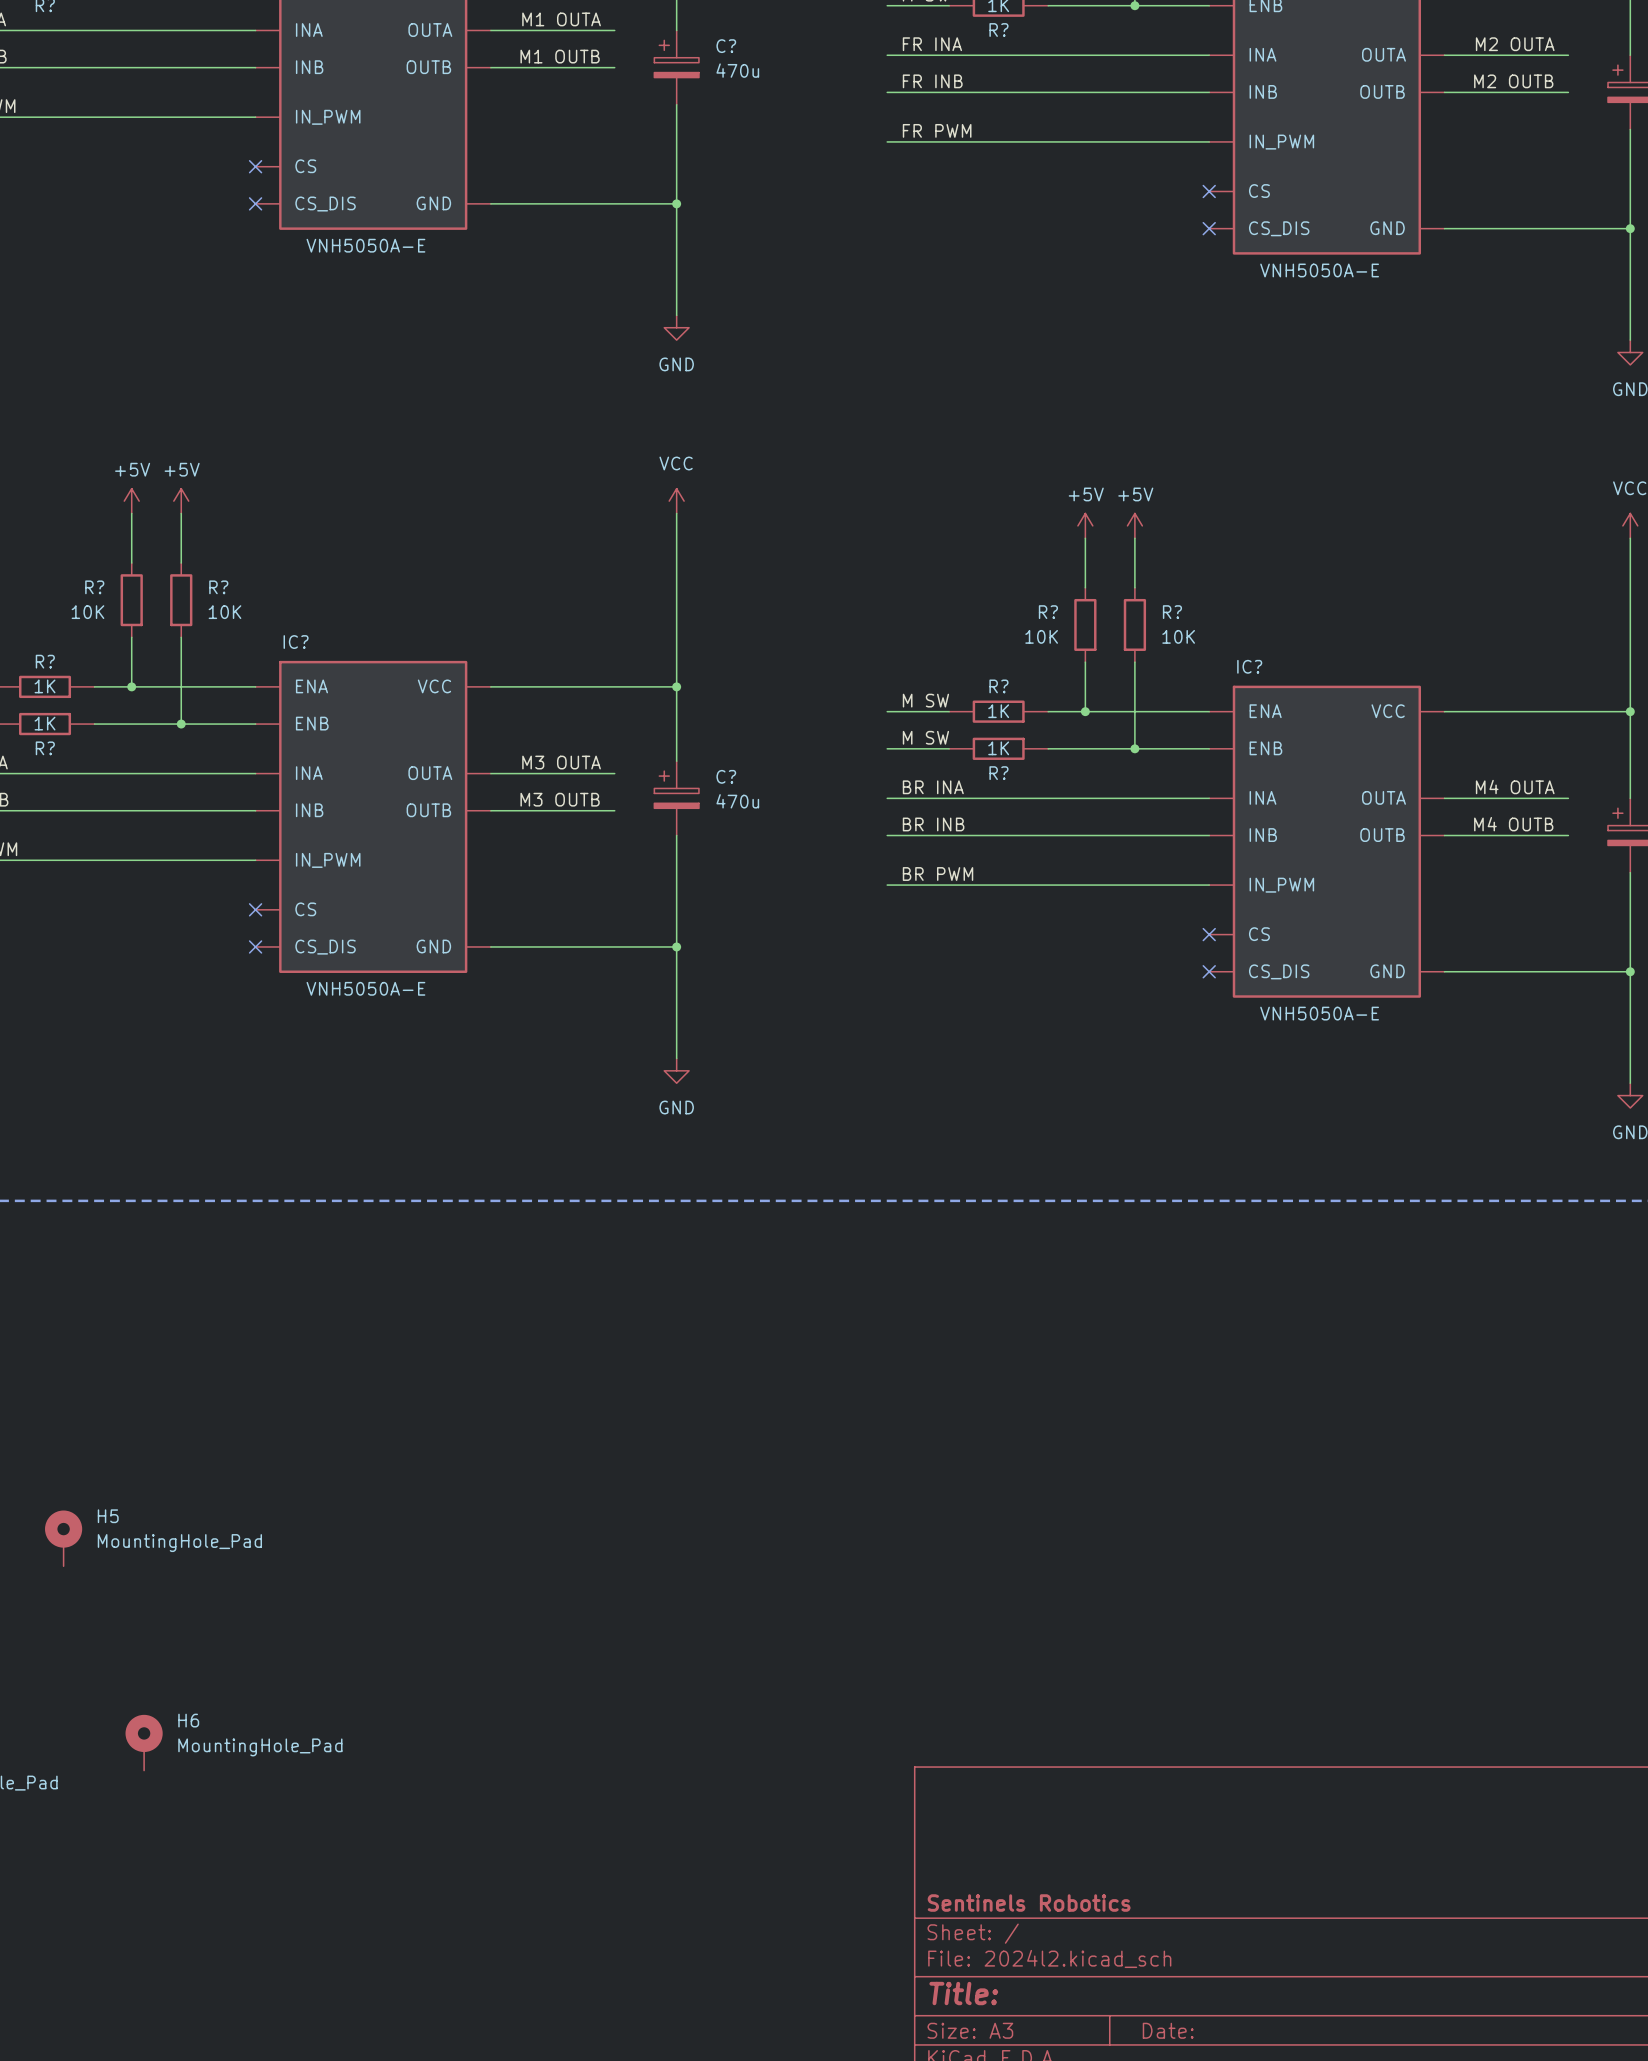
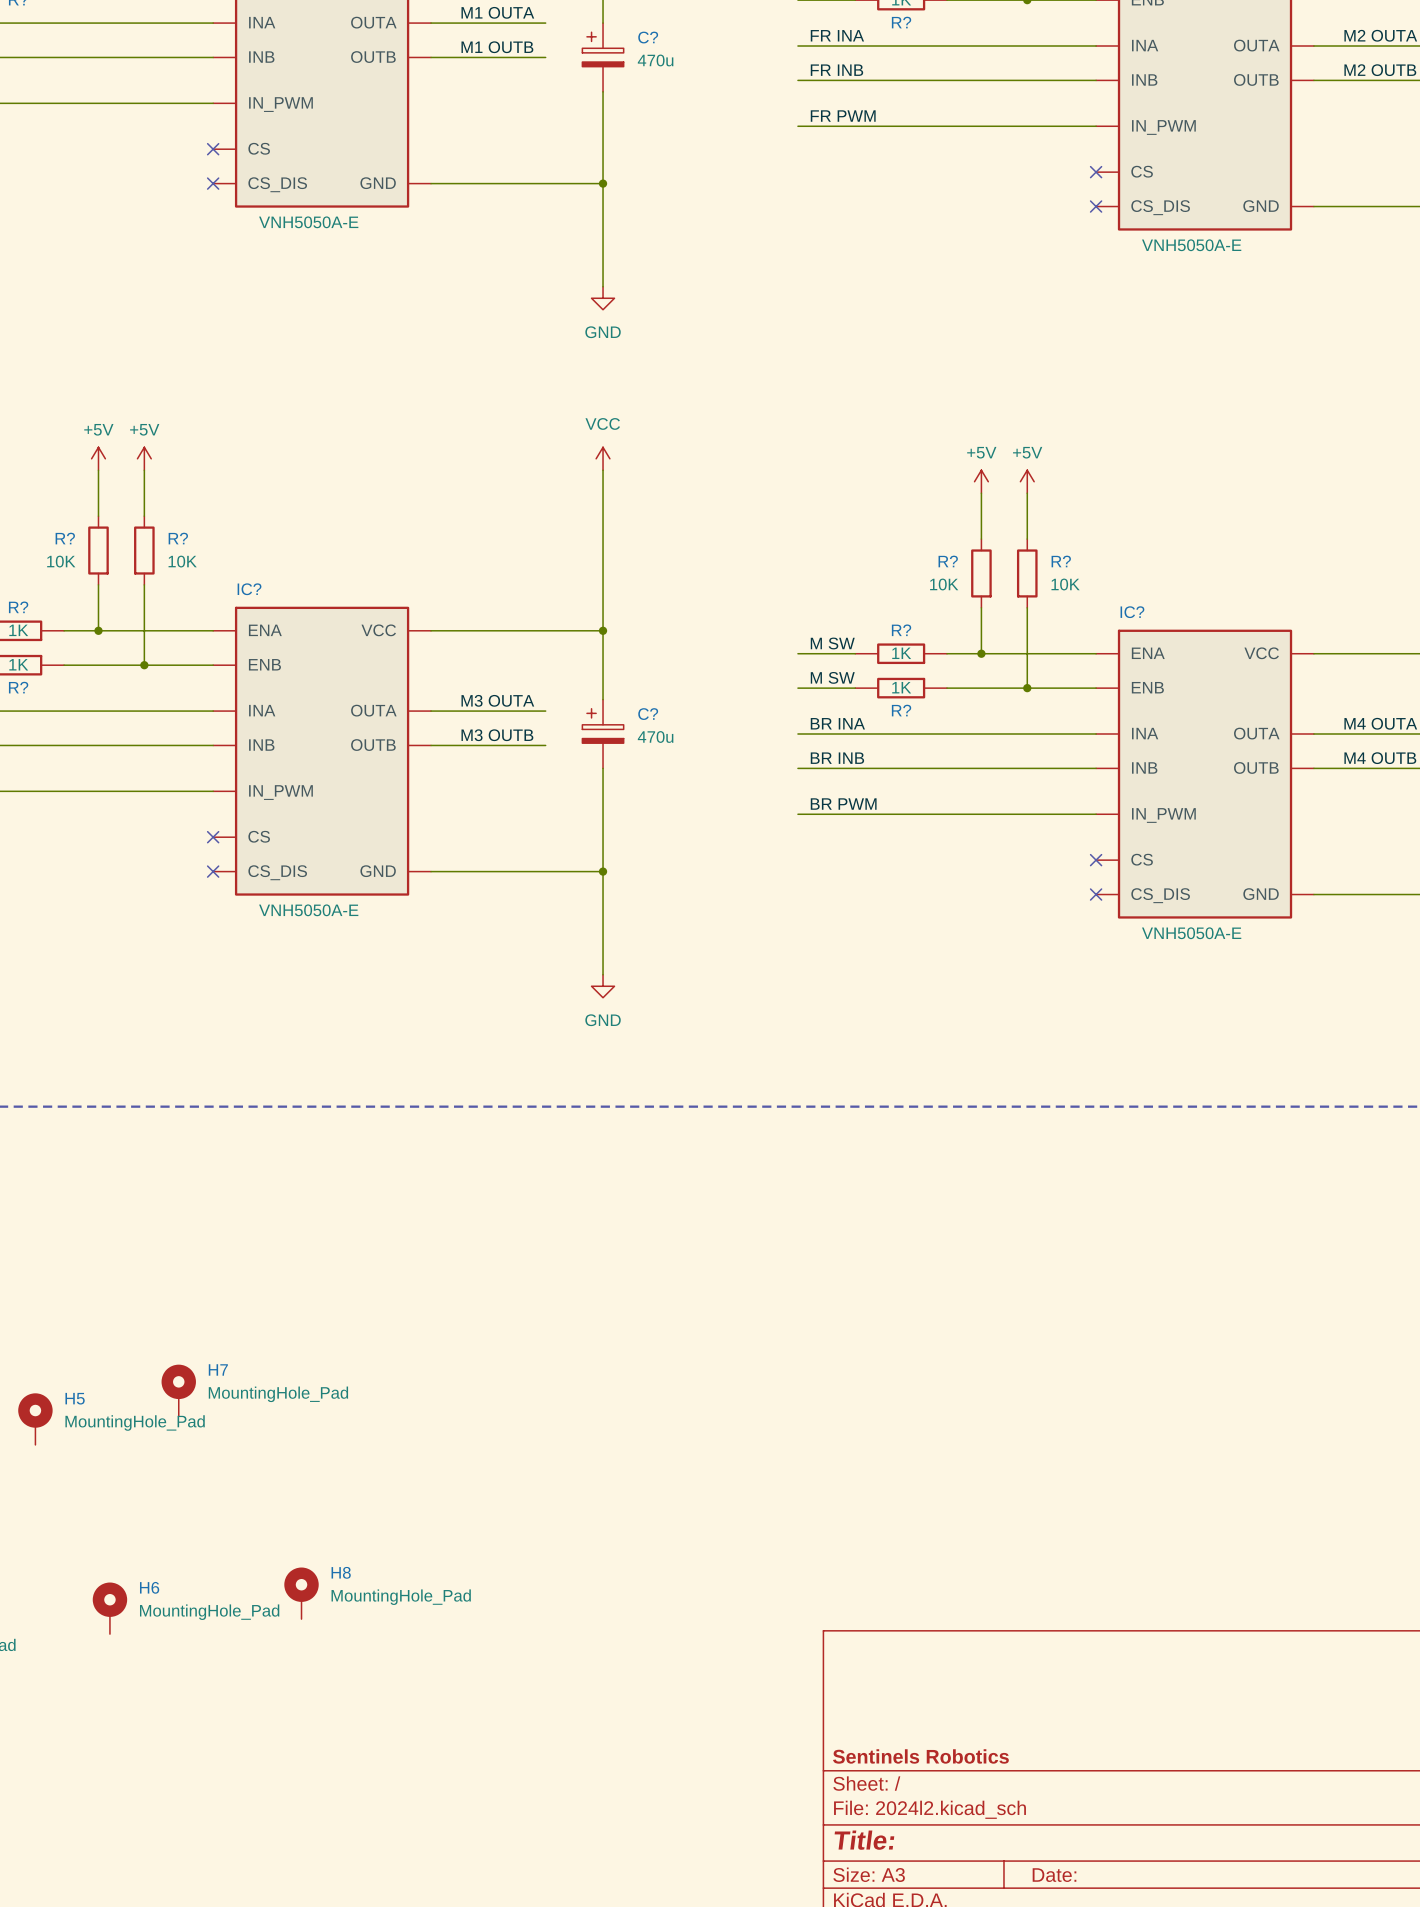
H7: none -> MountingHole_Pad (178, 1390)
H8: none -> MountingHole_Pad (301, 1593)

